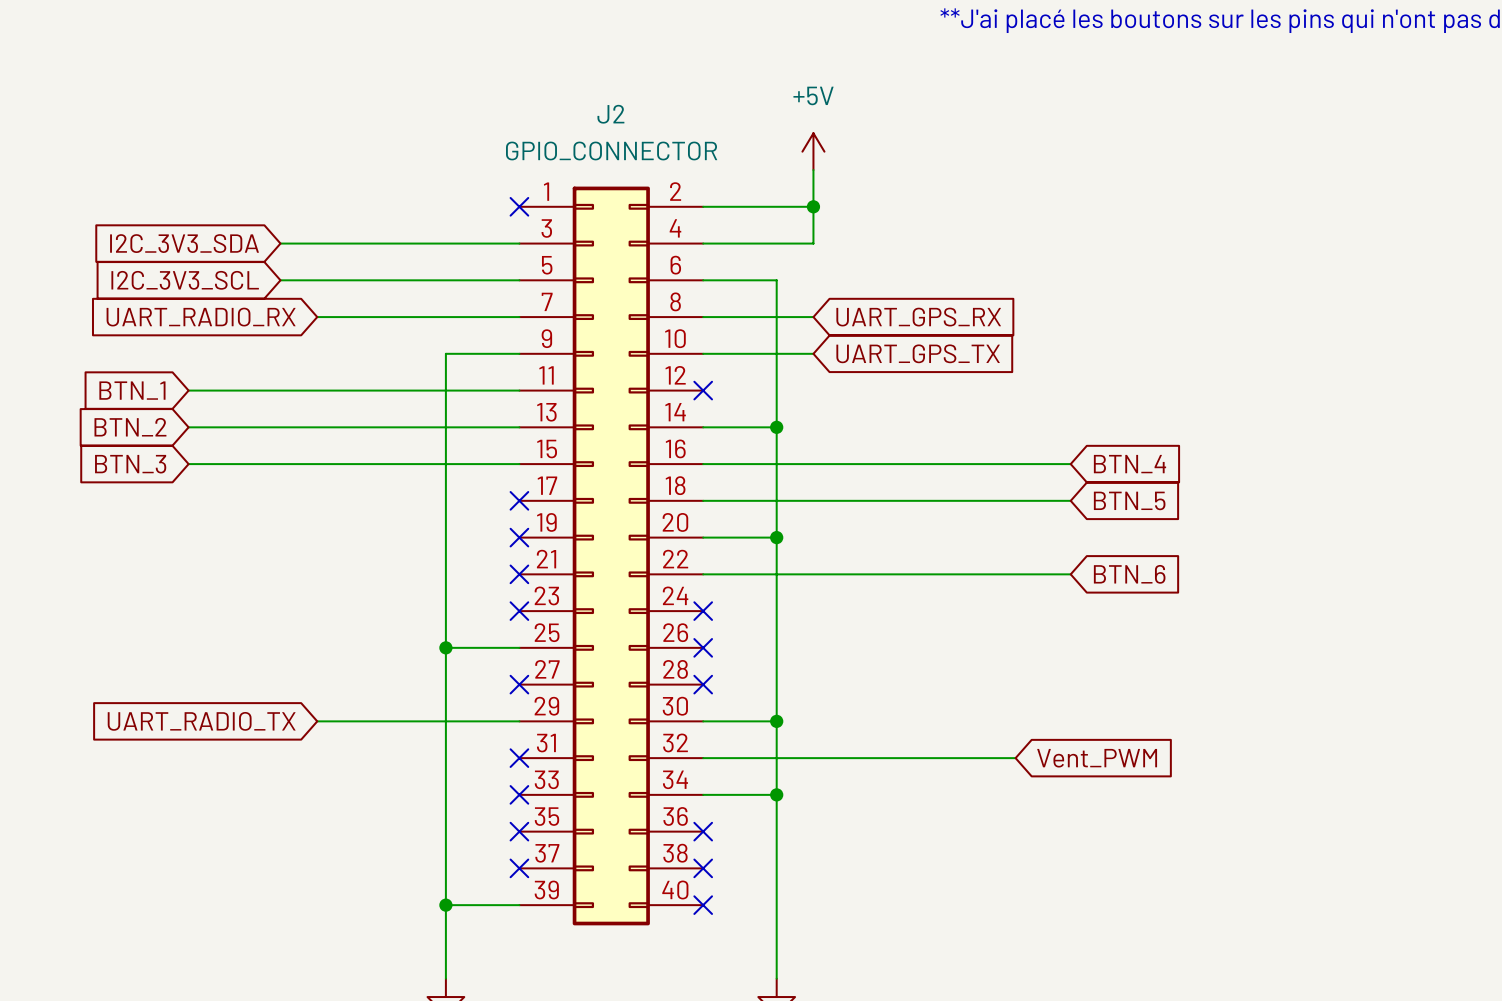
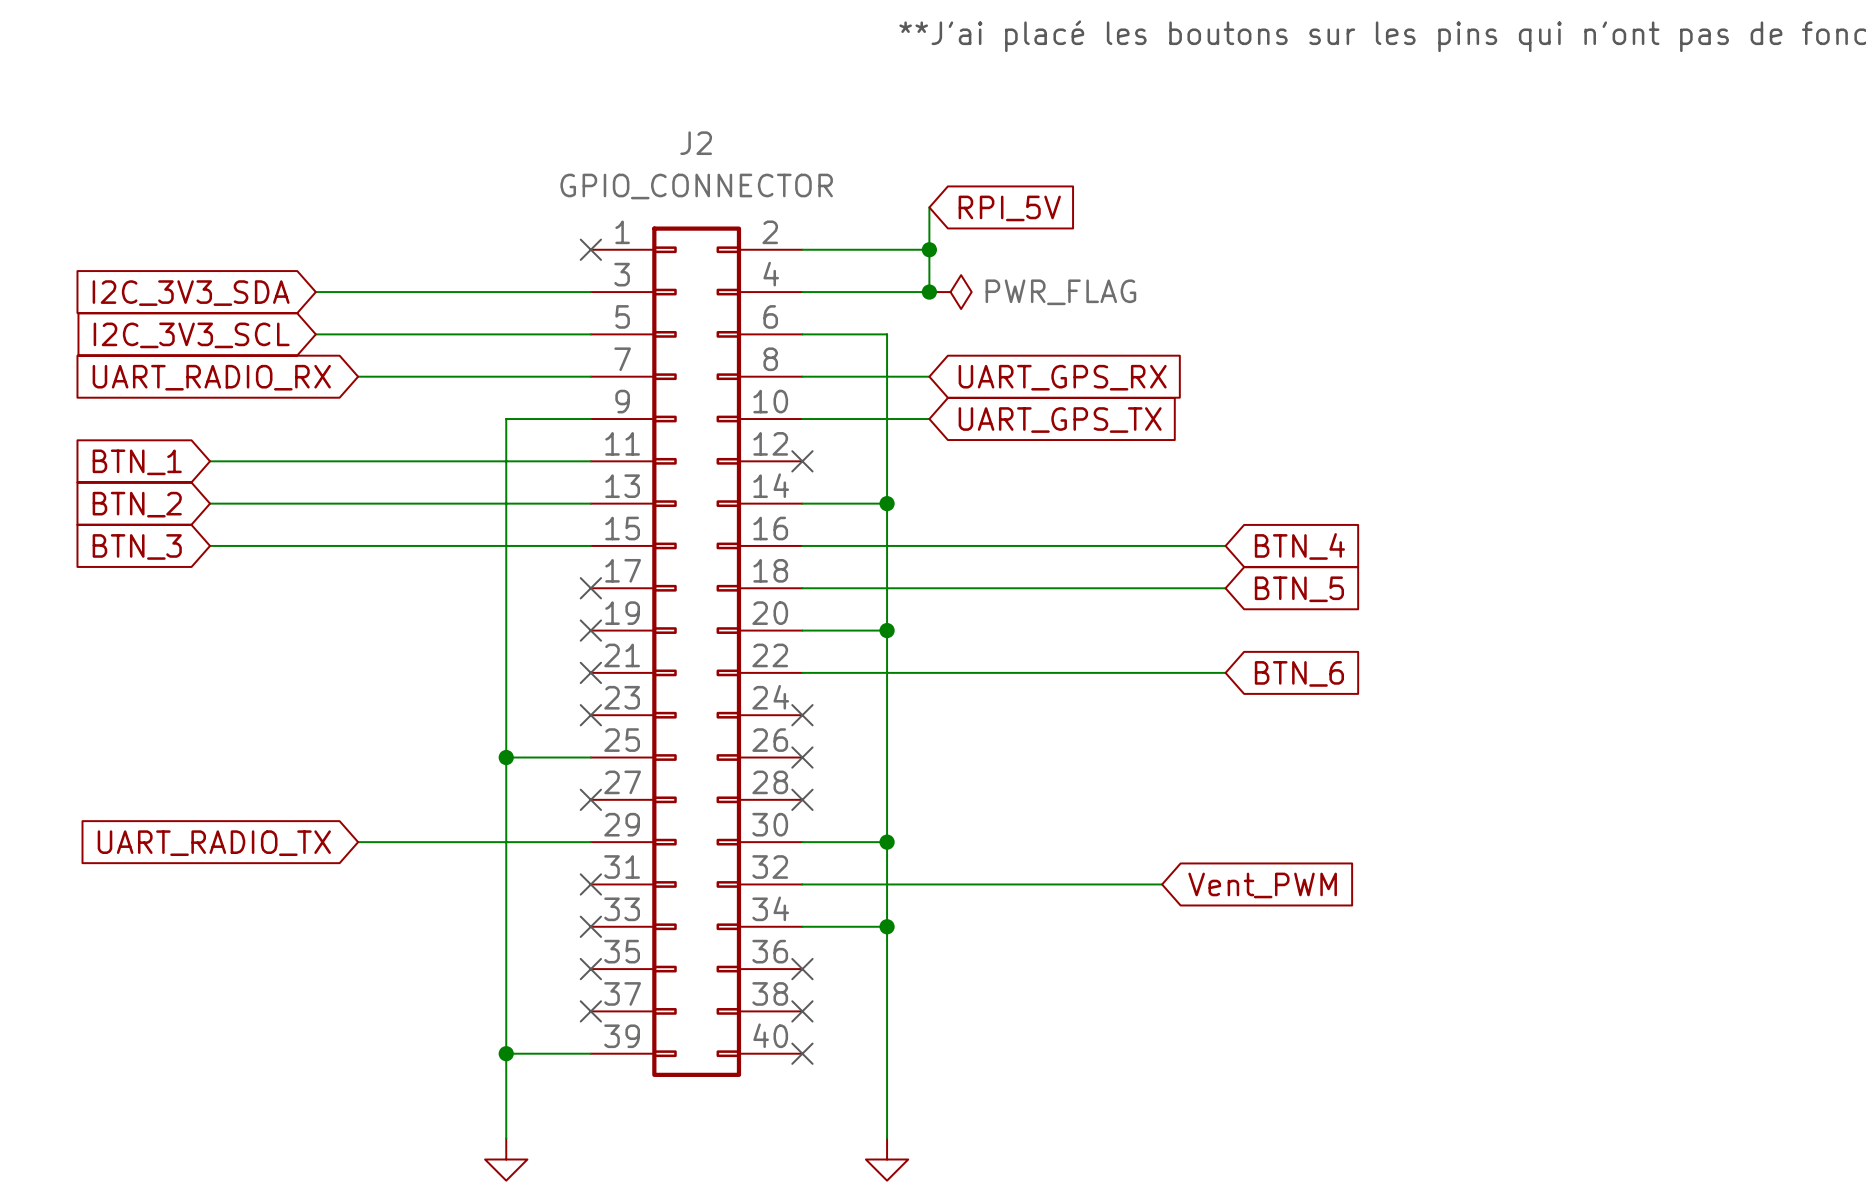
power symbol: +5V (813, 151) -> none
global label: none -> RPI_5V (1009, 208)
junction: none -> (929, 292)
power symbol: none -> PWR_FLAG (950, 292)

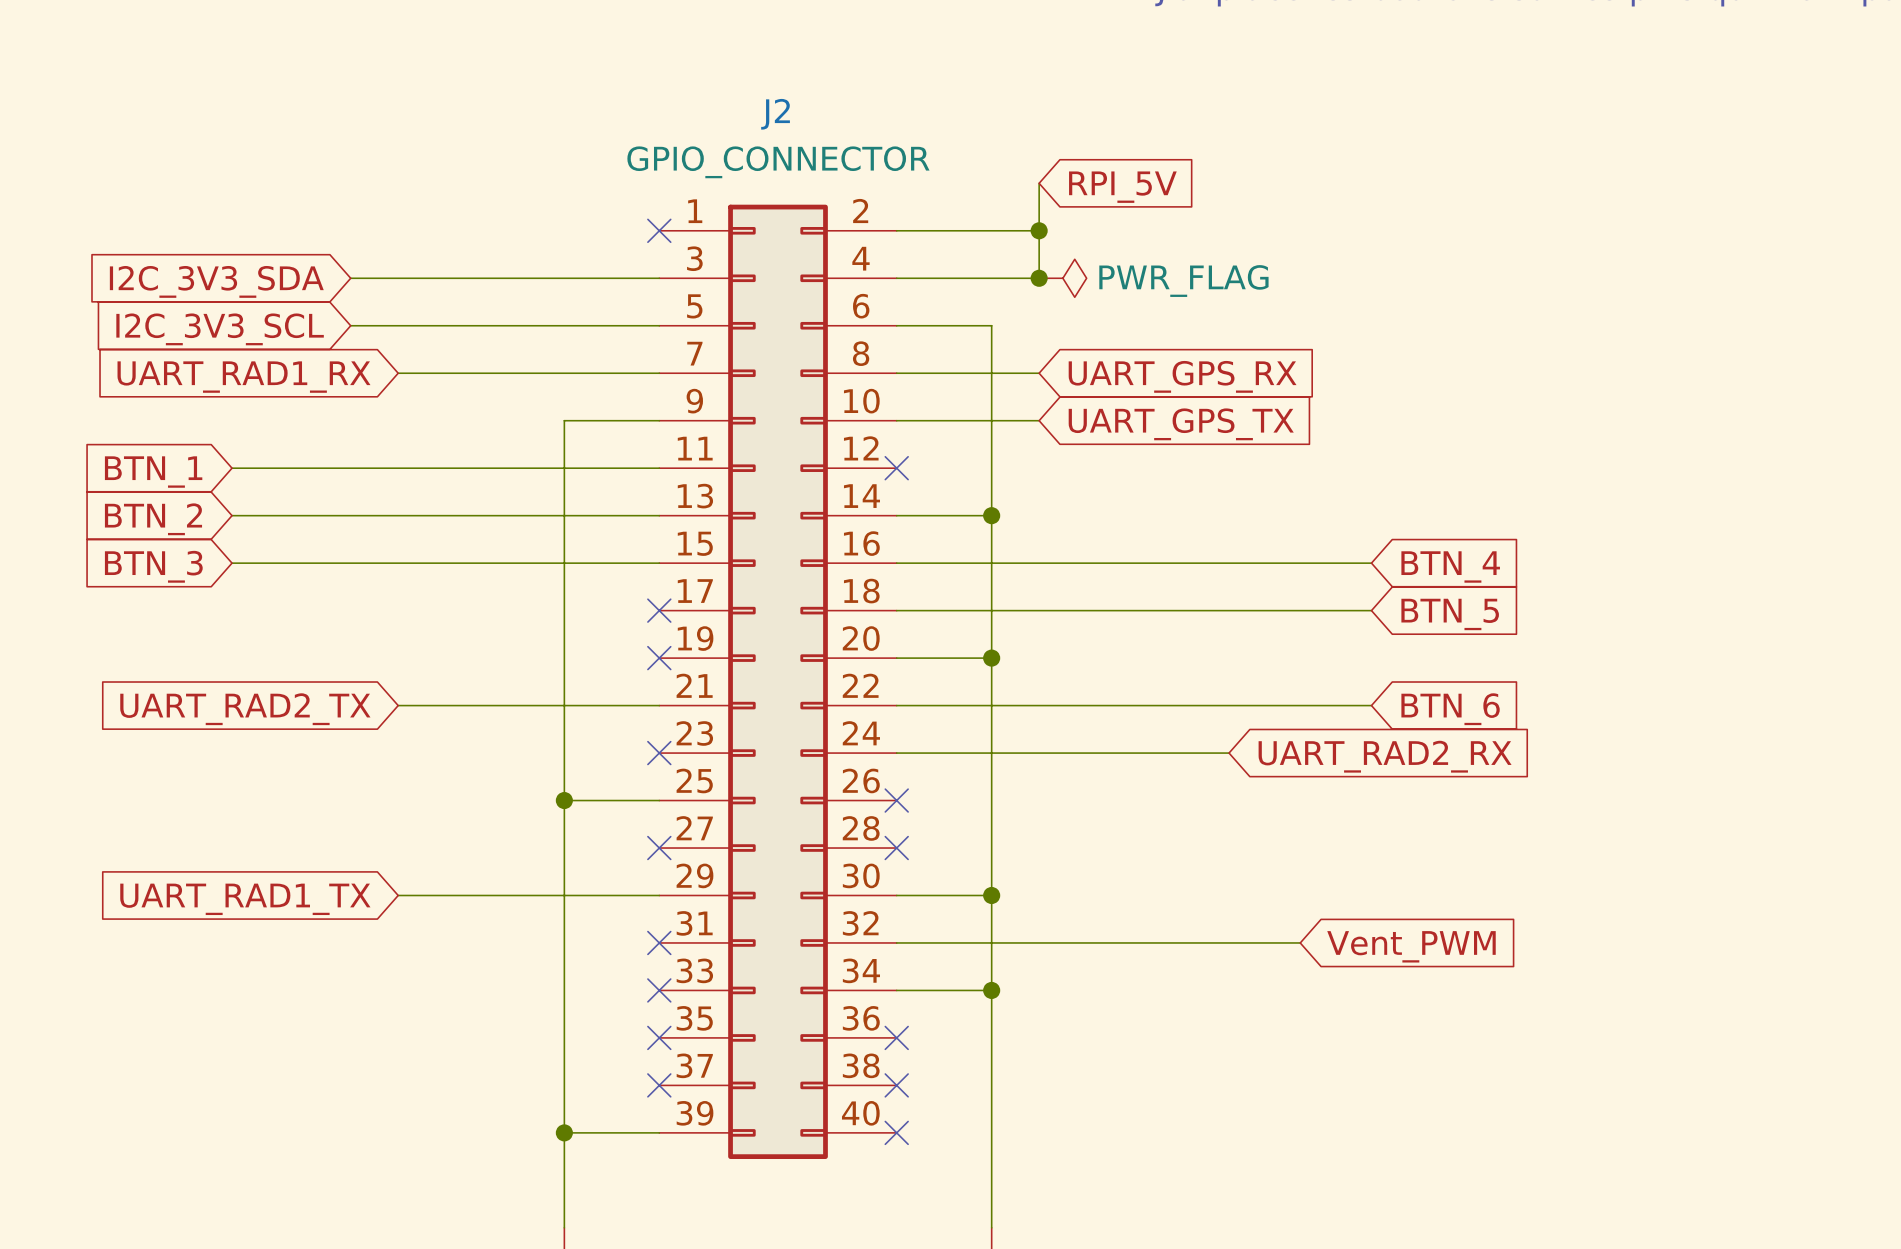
global label: UART_RADIO_RX (211, 377) -> UART_RAD1_RX (243, 377)
wire: none -> (398, 705) (659, 705)
no-connect mark: (590, 672) -> none
global label: none -> UART_RAD2_TX (245, 709)
wire: none -> (896, 753) (1229, 753)
no-connect mark: (802, 715) -> none
global label: none -> UART_RAD2_RX (1385, 756)
global label: UART_RADIO_TX (214, 843) -> UART_RAD1_TX (245, 899)

